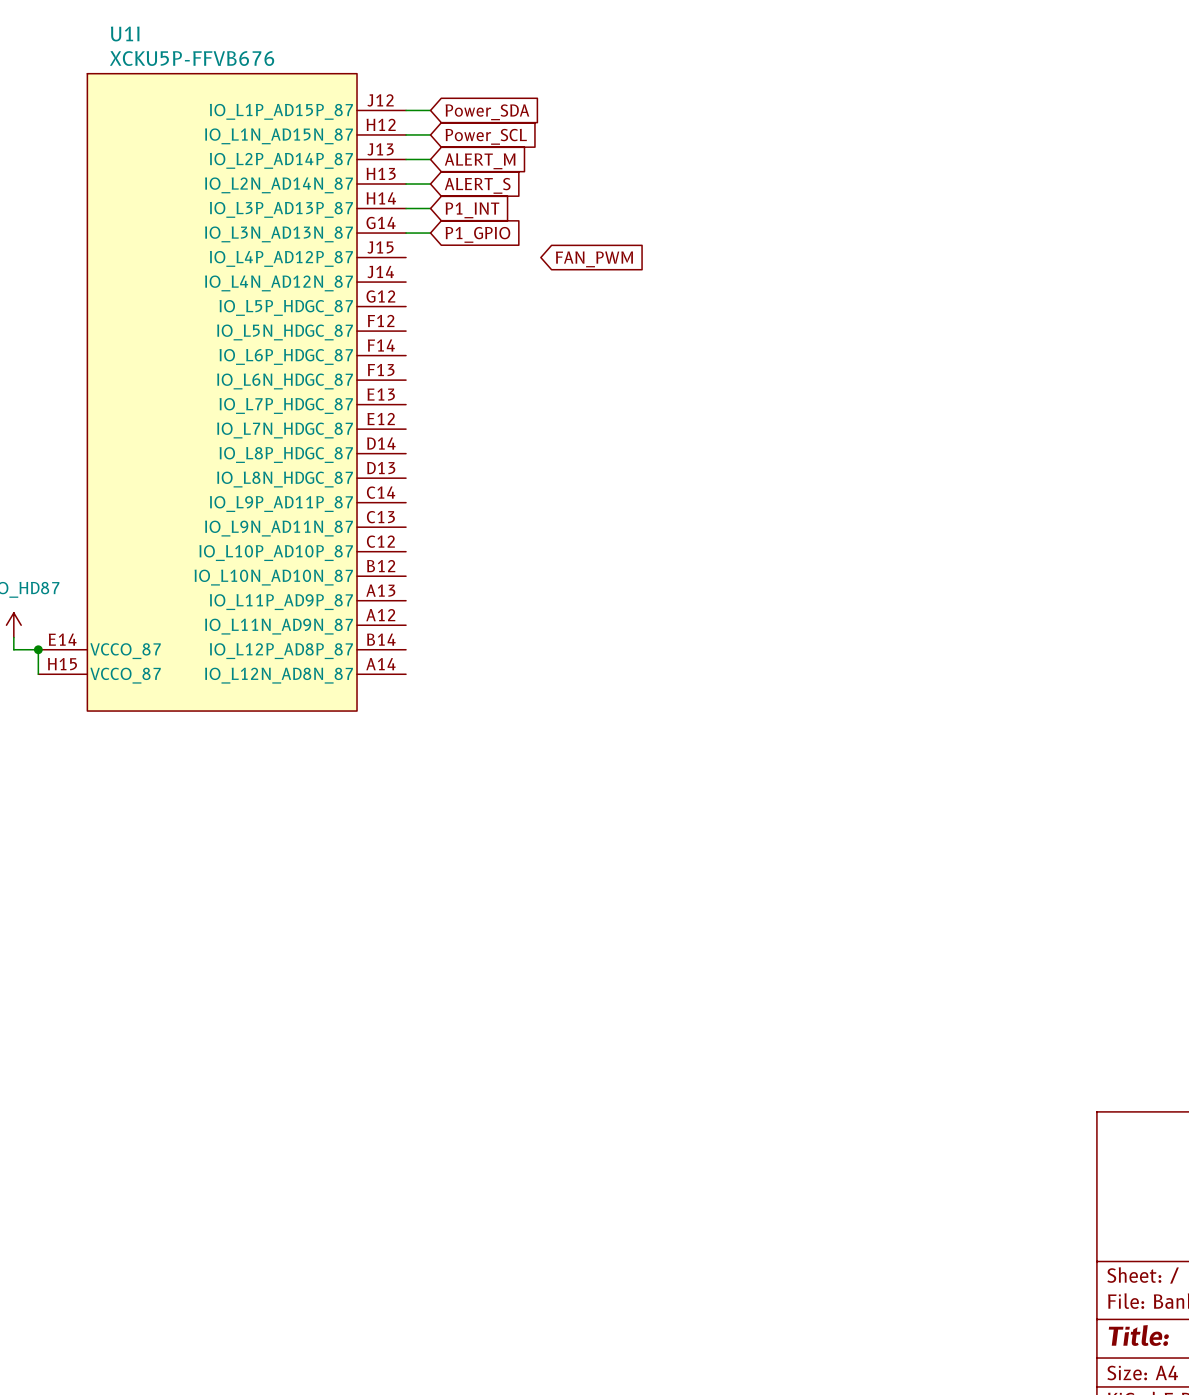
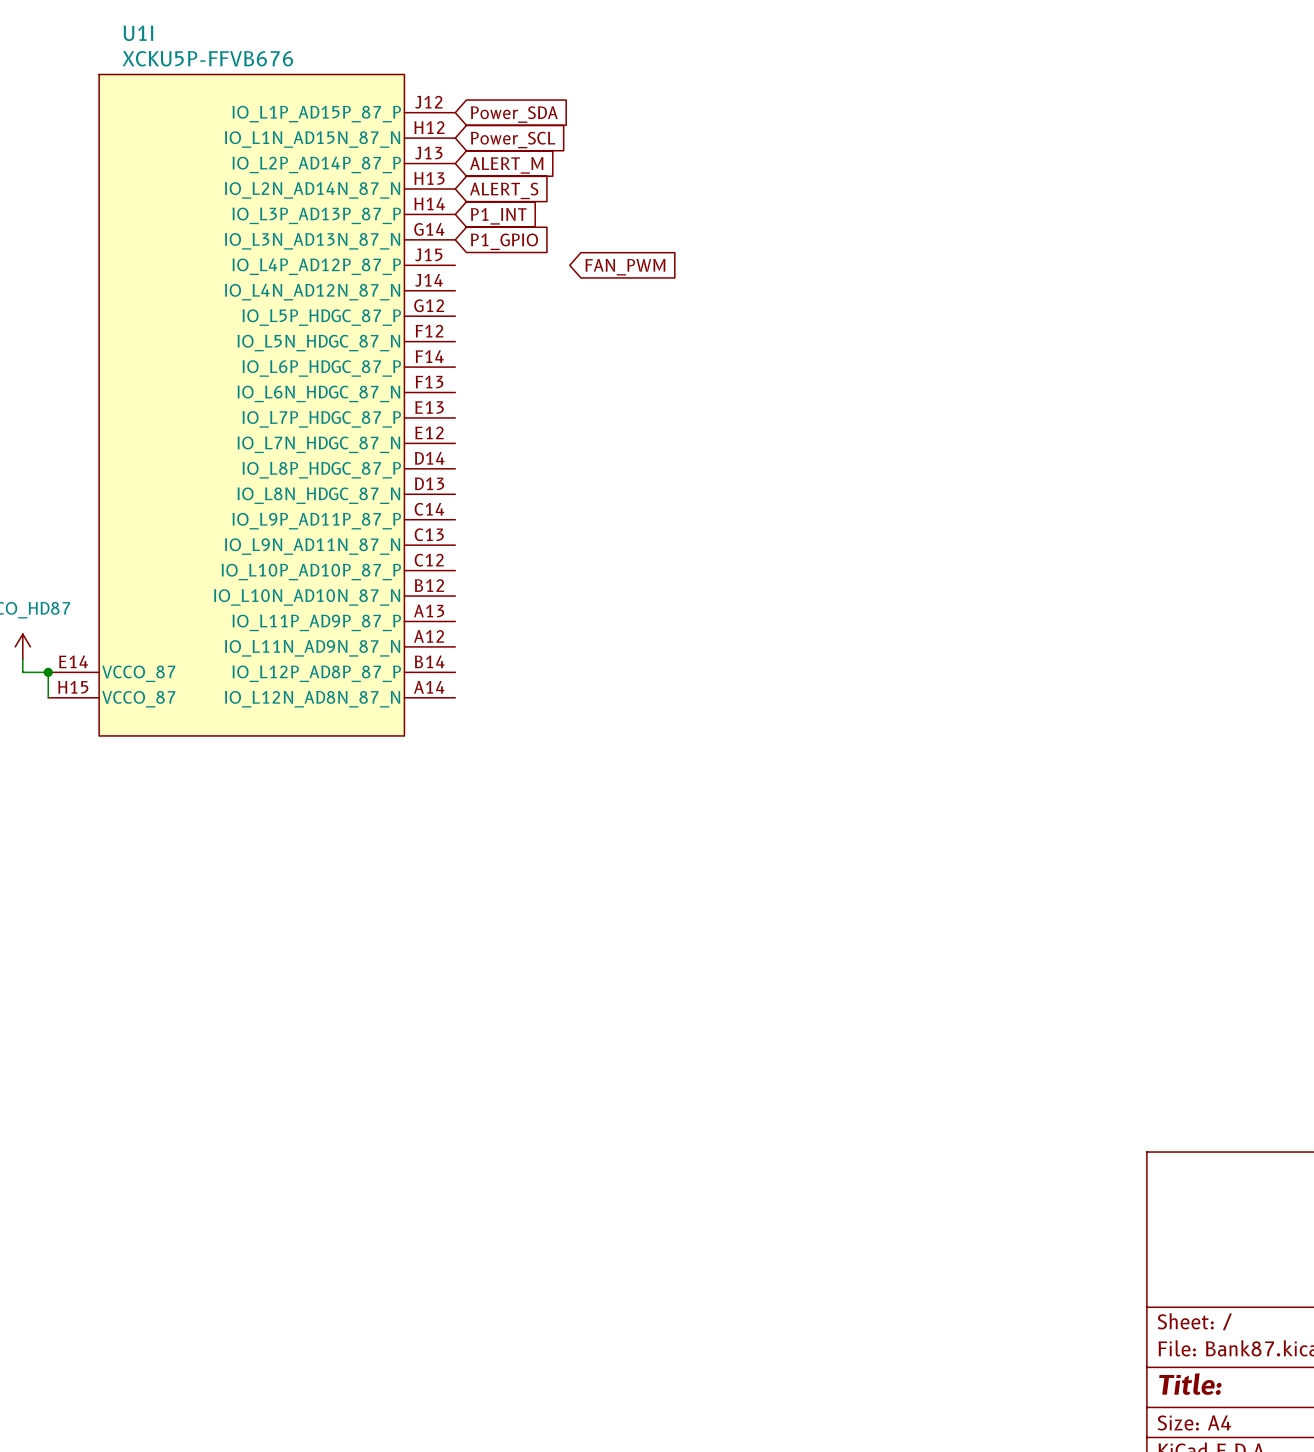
U1I symbol: [38, 73, 407, 712] -> [48, 74, 456, 736]

